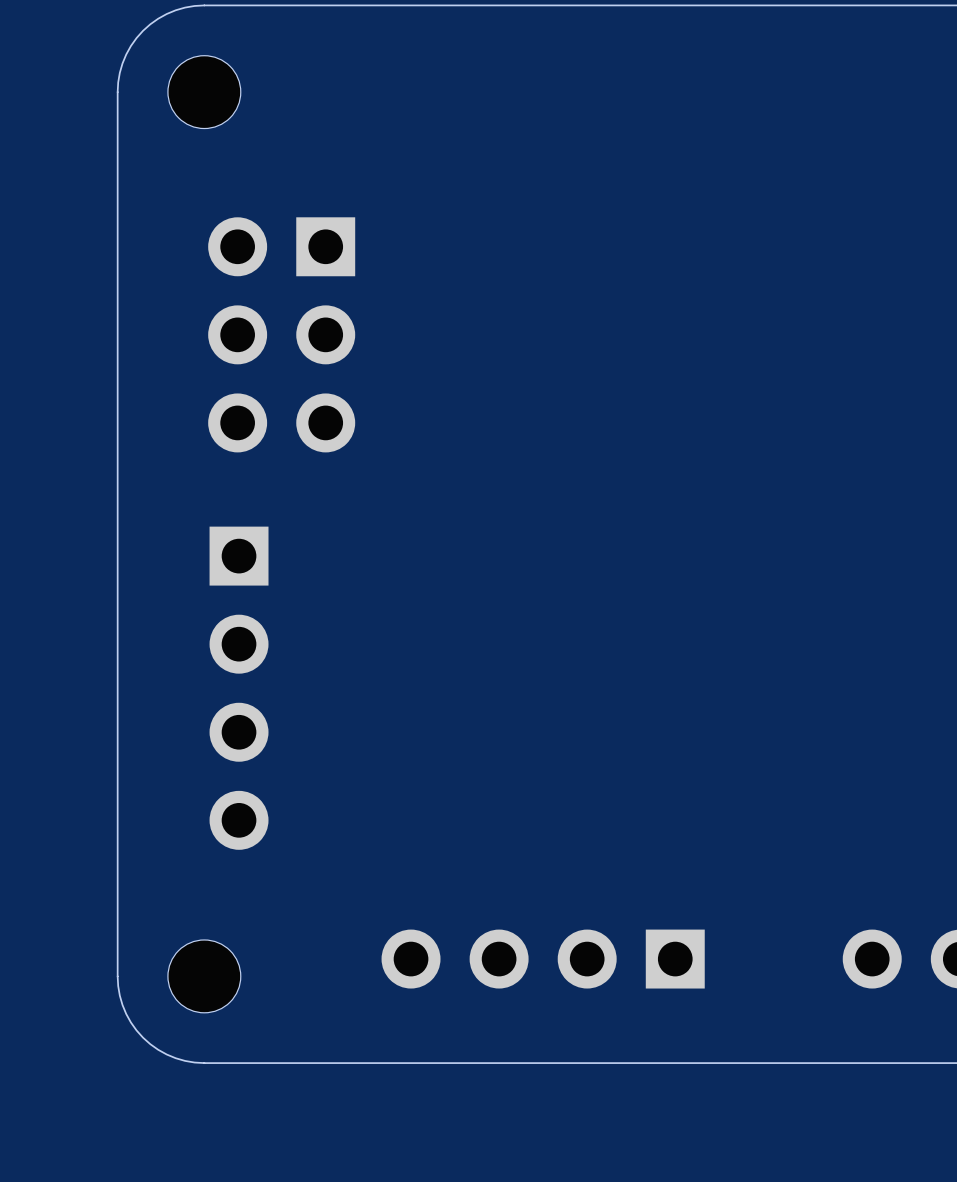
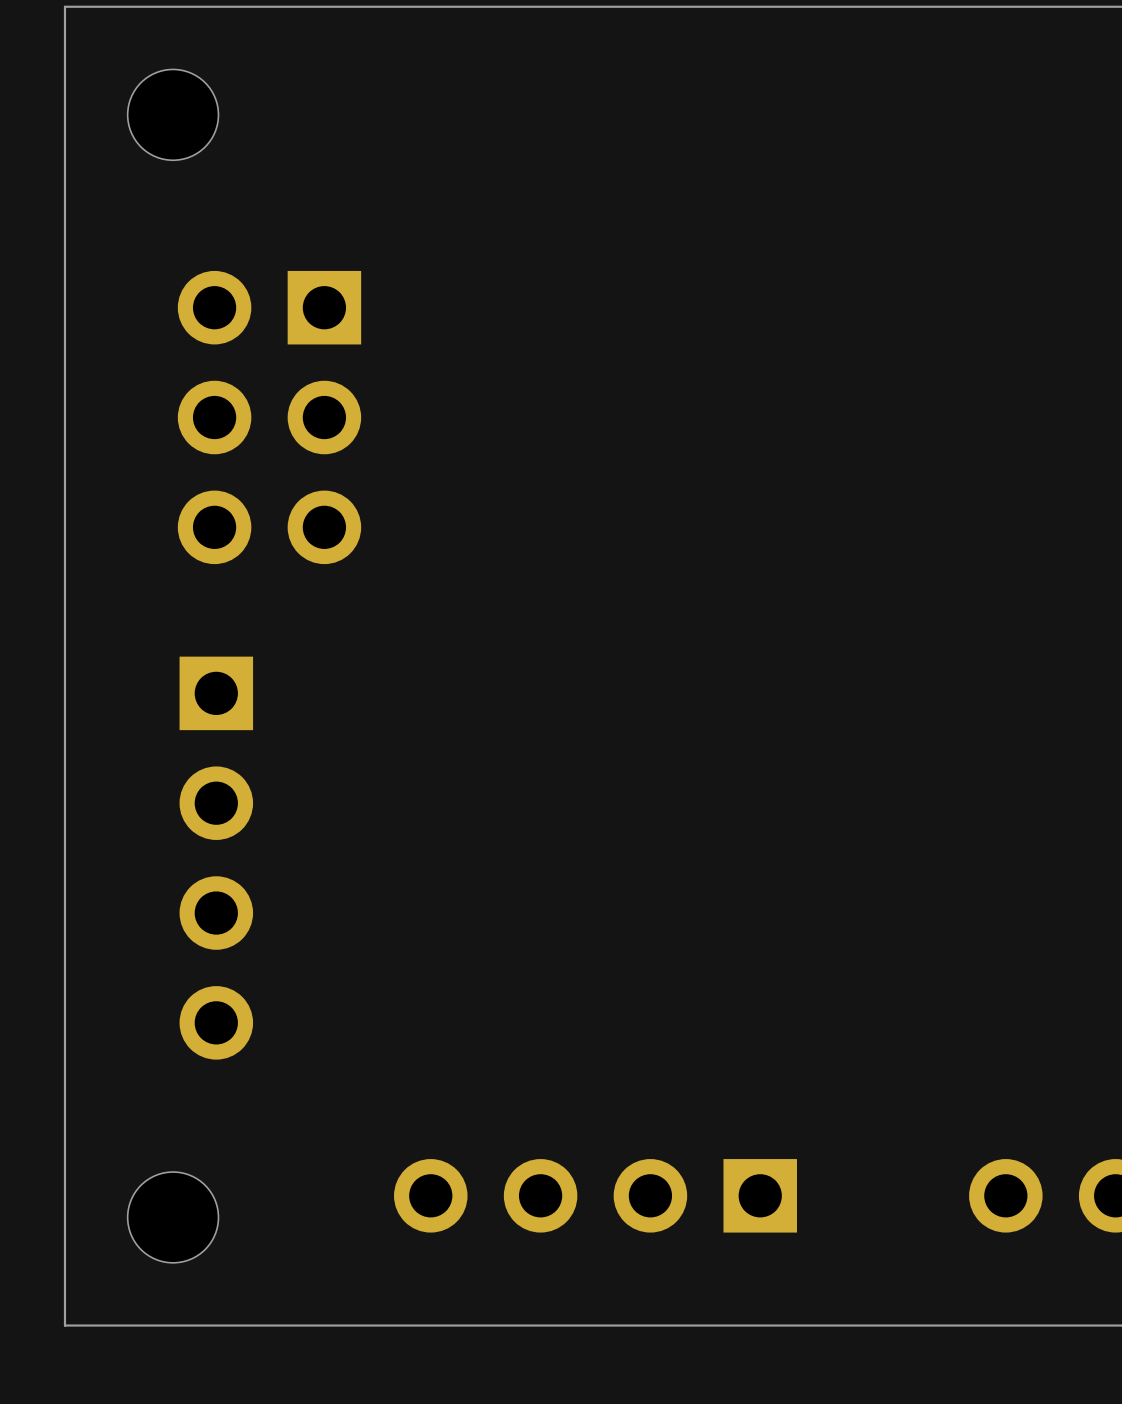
board edge: (204, 5) (185, 7) (166, 14) (143, 30) (130, 45) (122, 63) (117, 92) -> (173, 6) (64, 6) (64, 114)
board edge: (117, 976) (122, 1005) (130, 1022) (143, 1037) (158, 1049) (175, 1058) (204, 1063) -> (64, 1217) (64, 1325) (173, 1325)

